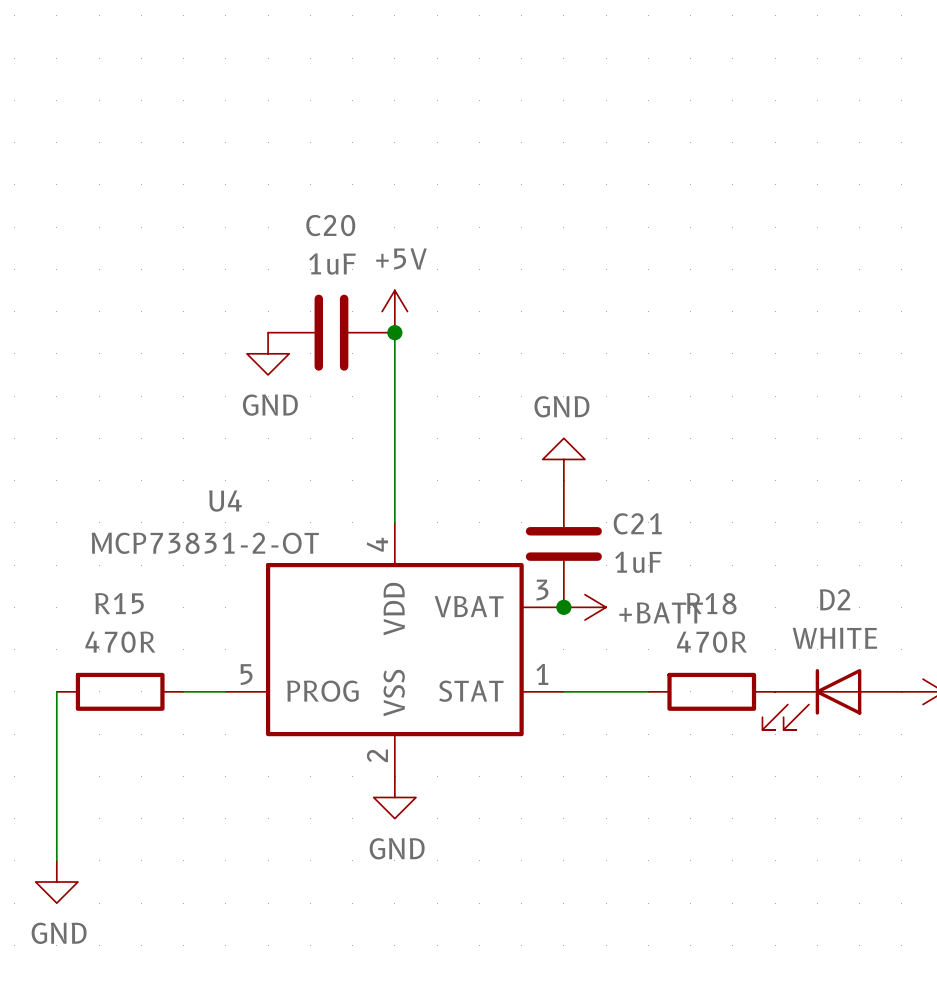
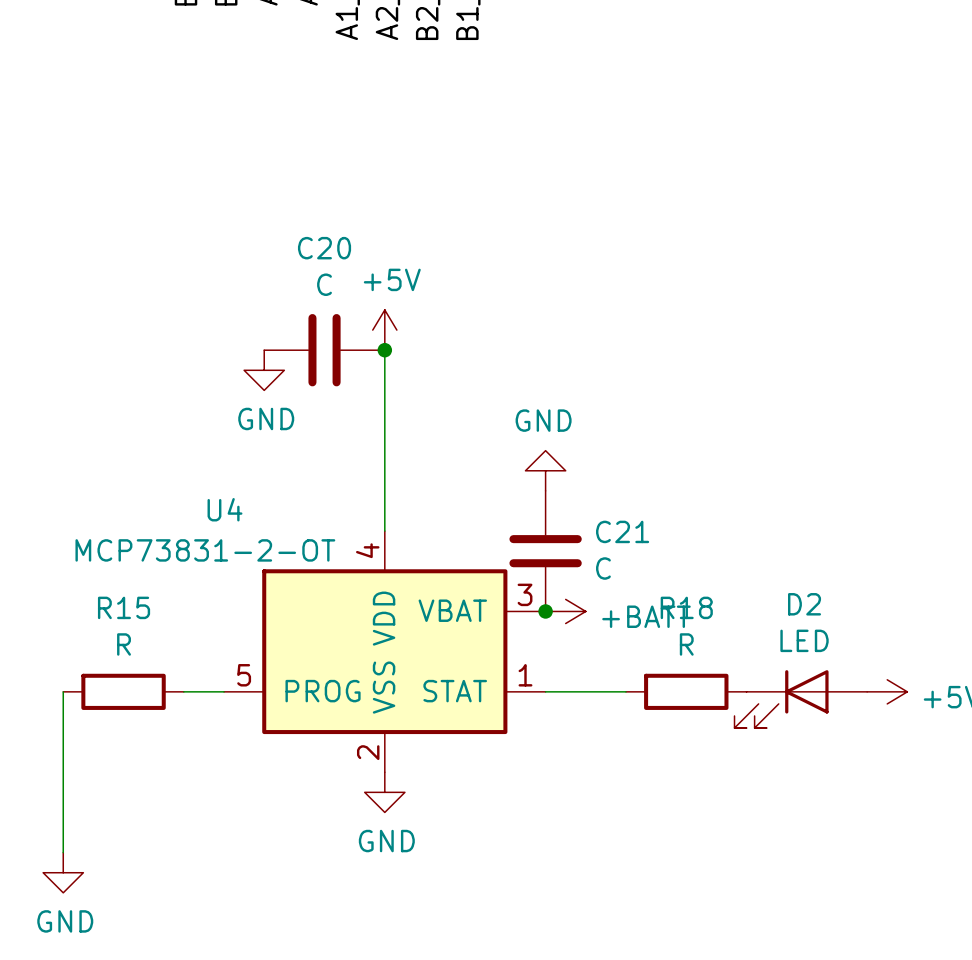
C20 value: 1uF (332, 263) -> C (324, 284)
C21 value: 1uF (638, 562) -> C (603, 568)
D2 value: WHITE (834, 638) -> LED (804, 640)
R15 value: 470R (120, 642) -> R (124, 644)
R18 value: 470R (711, 642) -> R (686, 644)

